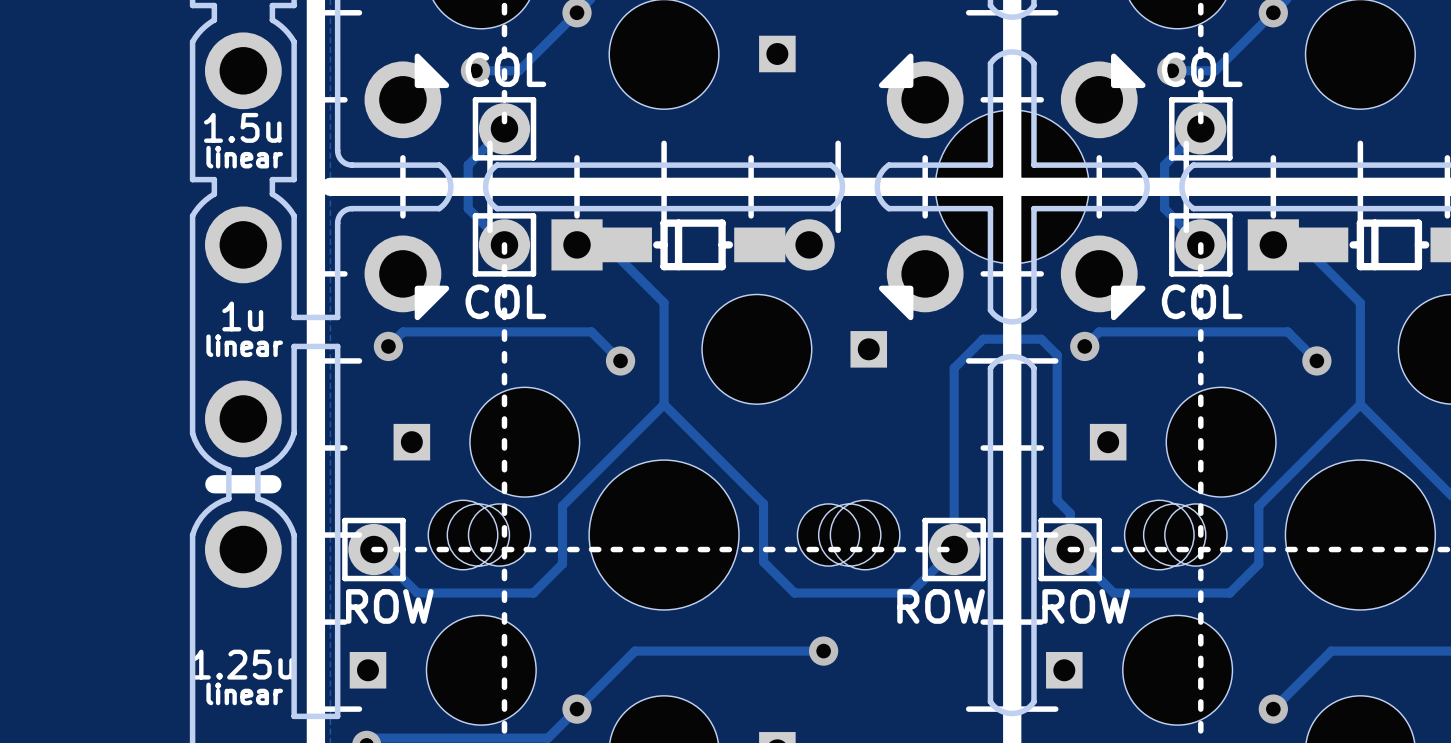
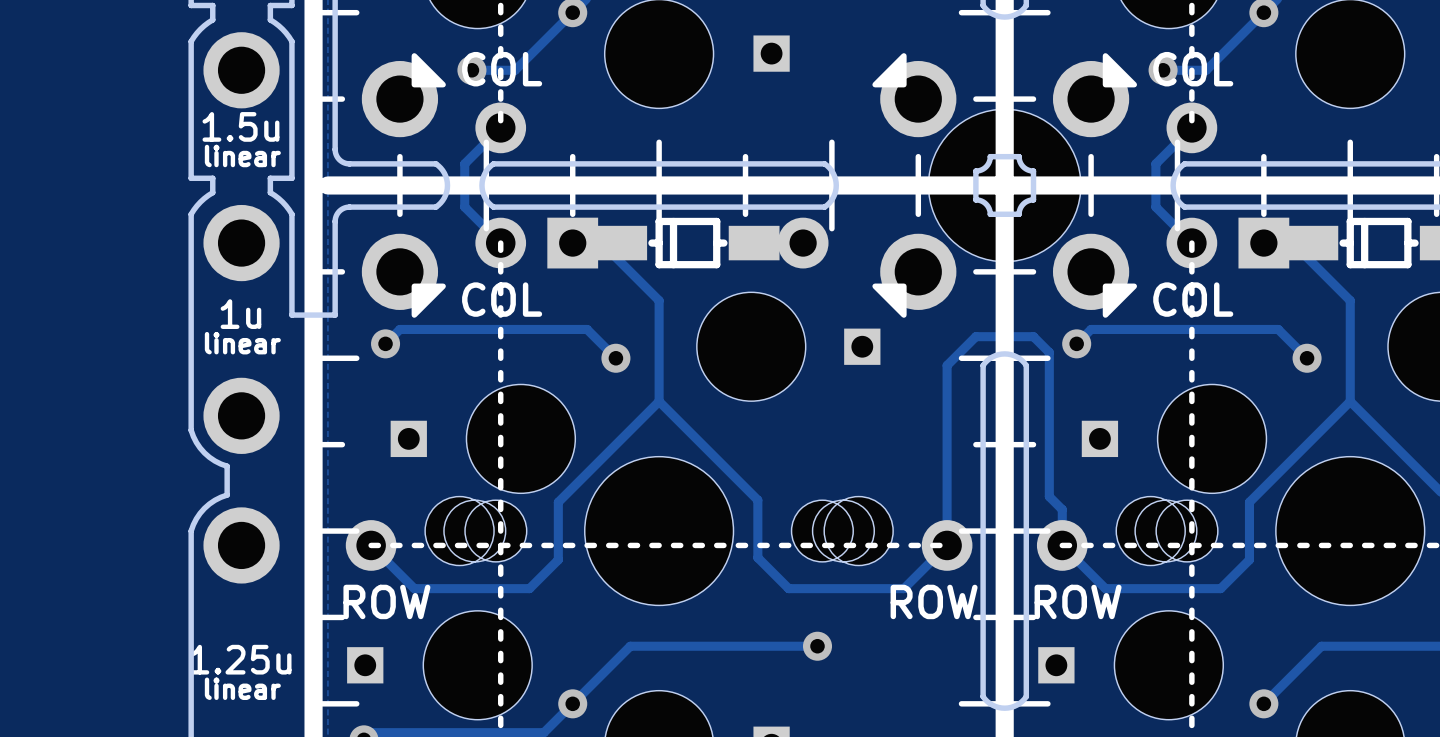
board edge: (990, 63) (990, 165) (888, 165) (879, 177) (877, 190) (880, 199) (888, 208) (990, 208) (990, 310) (1002, 320) (1015, 321) (1024, 318) (1033, 310) (1033, 208) (1135, 208) (1145, 196) (1146, 183) (1142, 171) (1135, 165) (1033, 165) (1033, 63) (1024, 55) (1012, 51) (999, 55) (990, 63) -> none
part footprint: [472, 97, 537, 161] -> [475, 102, 527, 154]
part footprint: [1169, 97, 1233, 161] -> [1166, 102, 1218, 154]
board edge: none -> (990, 156) (1019, 156) (1023, 166) (1033, 171) (1033, 199) (1023, 204) (1019, 214) (990, 214) (986, 204) (975, 199) (975, 171) (986, 166) (990, 156)
part footprint: [472, 213, 537, 277] -> [475, 217, 527, 269]
part footprint: [1169, 213, 1233, 277] -> [1166, 217, 1218, 269]
board edge: (294, 346) (294, 433) (288, 445) (280, 456) (270, 464) (257, 469) (257, 498) (270, 504) (280, 512) (288, 522) (294, 535) (294, 716) (337, 716) (337, 346) (294, 346) -> none
line: (214, 484) (272, 484) -> none
part footprint: [342, 517, 406, 582] -> [345, 520, 397, 571]
part footprint: [922, 517, 986, 582] -> [921, 520, 973, 571]
part footprint: [1038, 517, 1103, 582] -> [1036, 520, 1088, 571]

